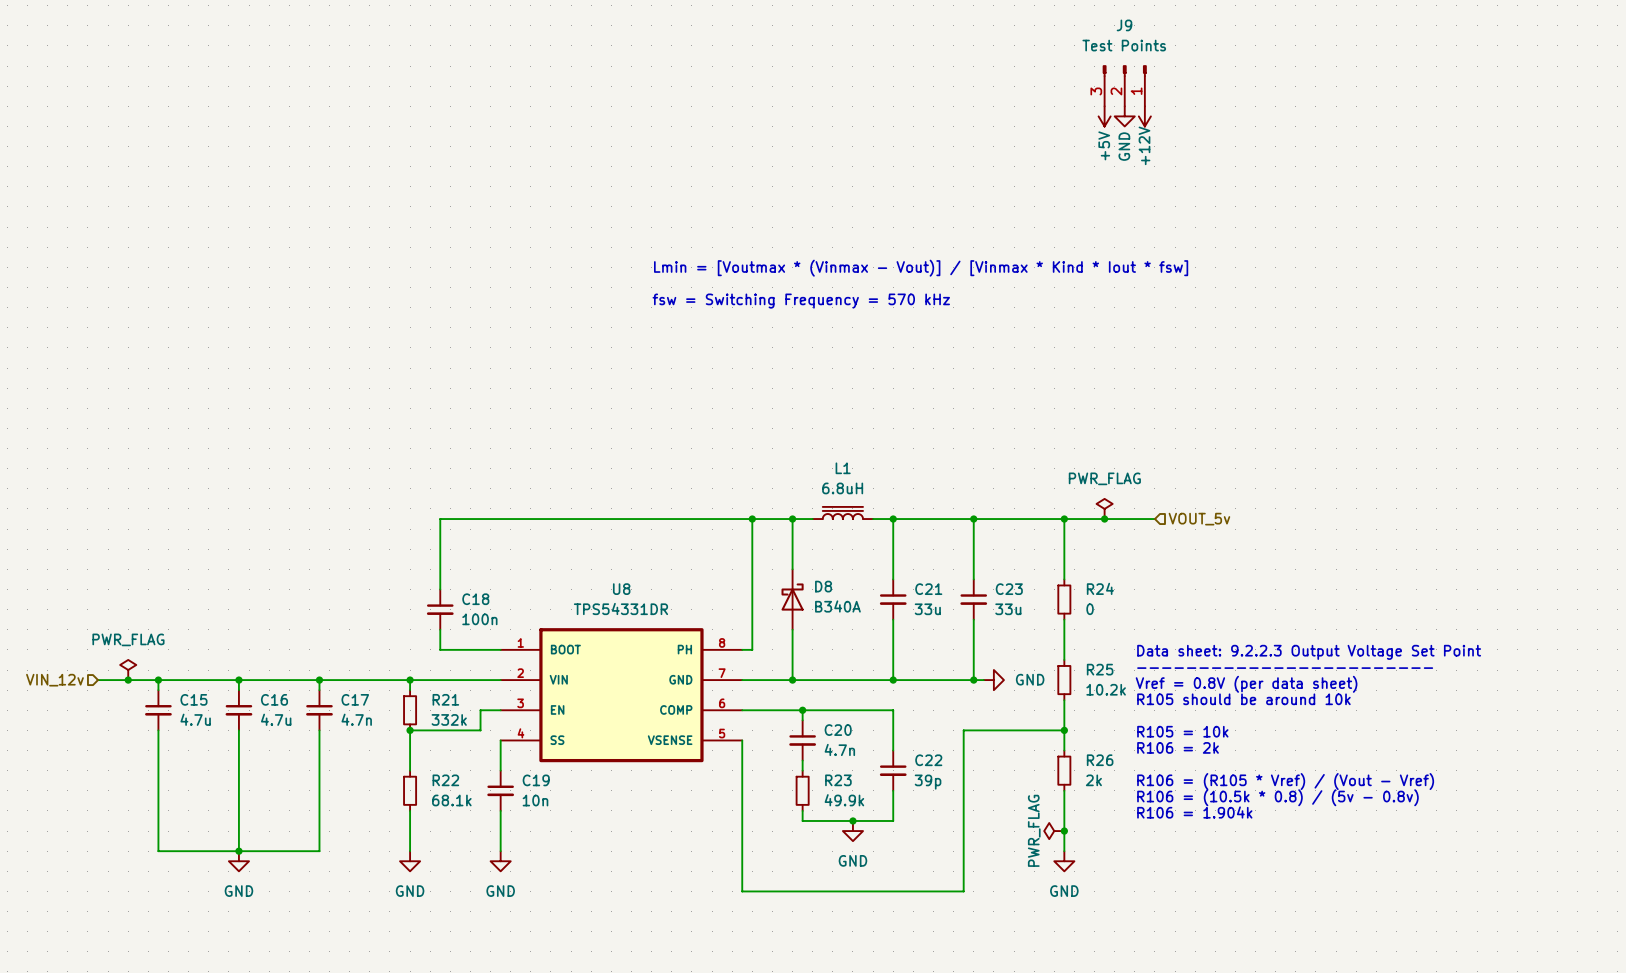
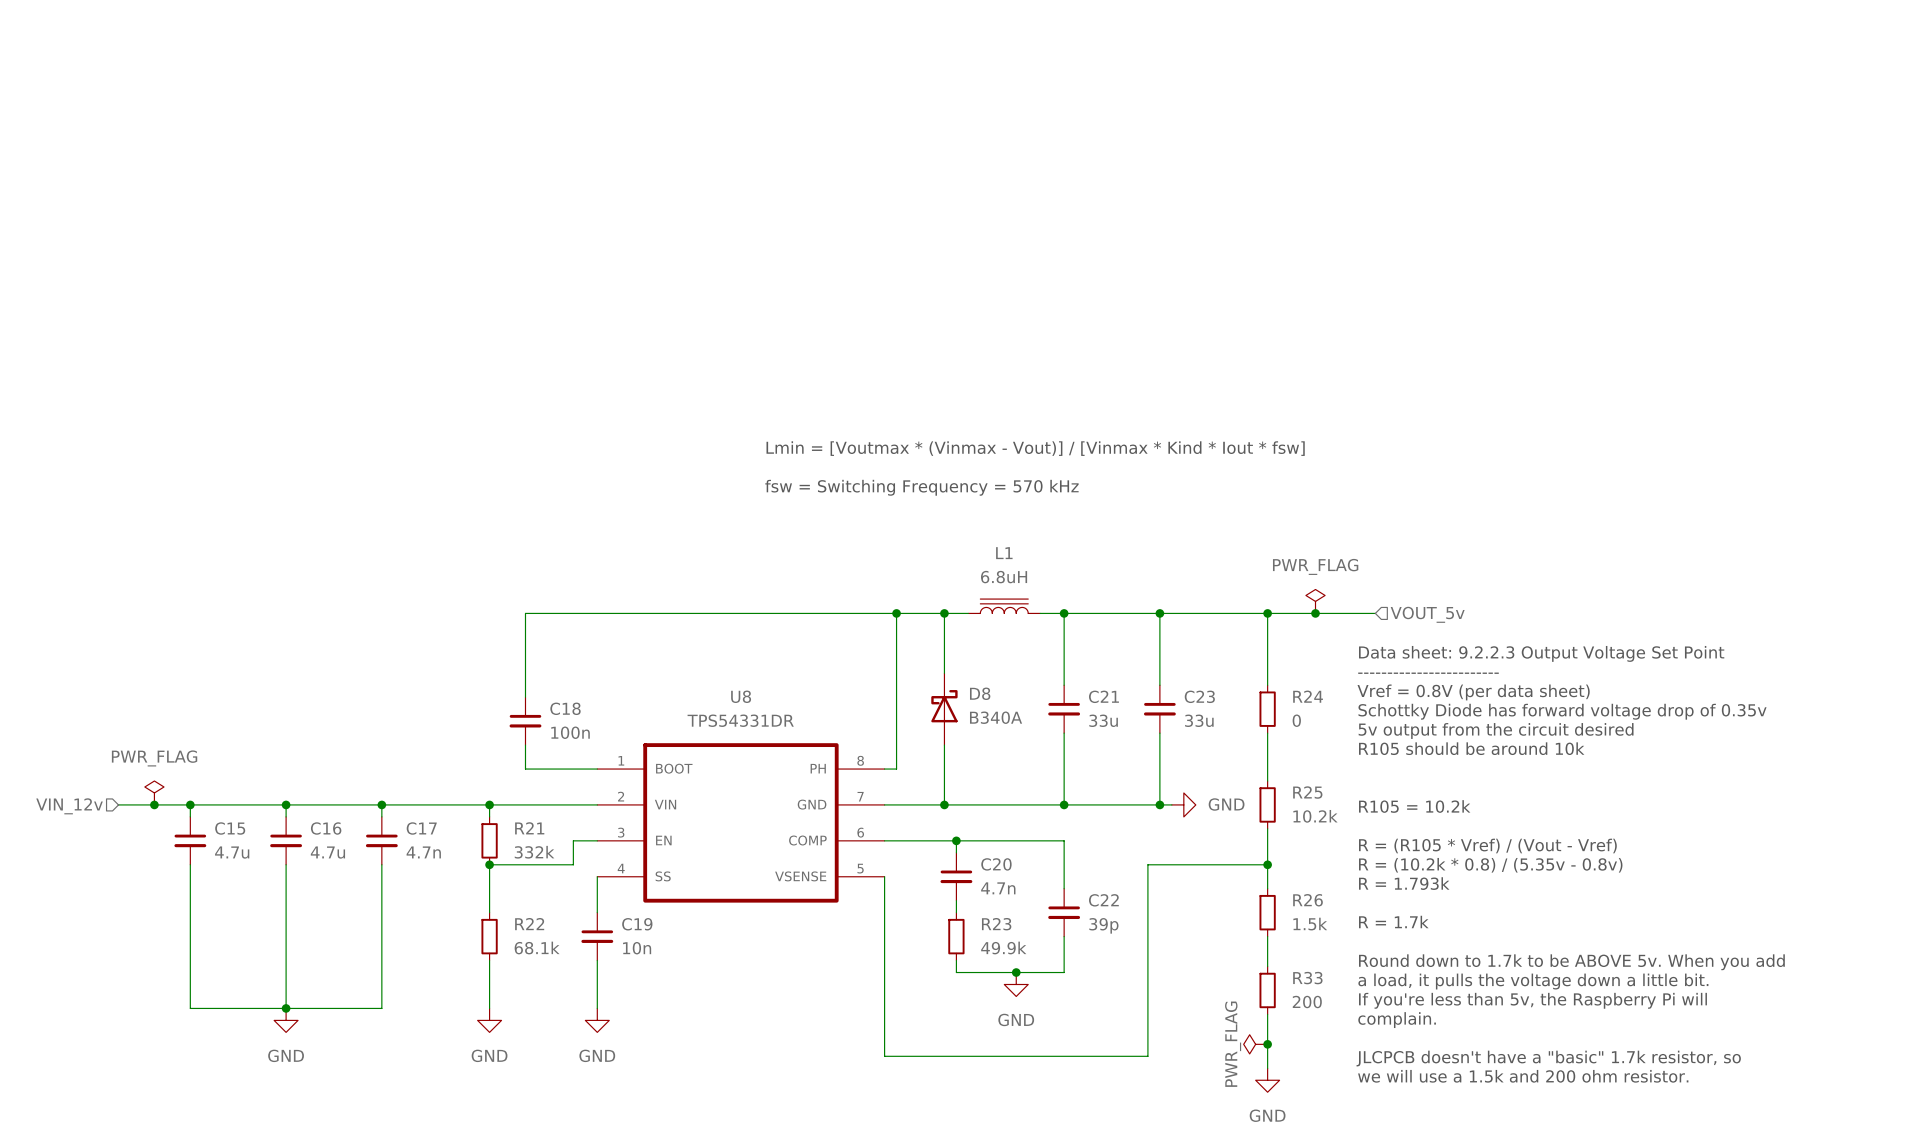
J9: Test Points (1124, 85) -> none
power symbol: +5V (1104, 116) -> none
power symbol: GND (1124, 116) -> none
power symbol: +12V (1144, 116) -> none
text position: Lmin = [Voutmax * (Vinmax - Vout)] / [Vinmax * Kind * Iout * fsw] (921, 268) -> Lmin = [Voutmax * (Vinmax - Vout)] / [Vinmax * Kind * Iout * fsw] (1035, 448)
text position: fsw = Switching Frequency = 570 kHz (801, 301) -> fsw = Switching Frequency = 570 kHz (921, 487)
text: none -> Schottky Diode has forward voltage drop of 0.35v (1562, 711)
text: none -> 5v output from the circuit desired (1496, 731)
text position: Data sheet: 9.2.2.3 Output Voltage Set Point (1309, 652) -> Data sheet: 9.2.2.3 Output Voltage Set Point (1541, 653)
text position: ------------------------ (1285, 668) -> ------------------------ (1428, 673)
text: none -> R105 = 10.2k (1414, 806)
text position: Vref = 0.8V (per data sheet) (1246, 684) -> Vref = 0.8V (per data sheet) (1473, 692)
text position: R105 should be around 10k (1243, 699) -> R105 should be around 10k (1471, 748)
text: none -> R = (R105 * Vref) / (Vout - Vref) (1487, 846)
text: R105 = 10k (1182, 731) -> R = (10.2k * 0.8) / (5.35v - 0.8v) (1490, 865)
text: R106 = 2k (1178, 747) -> R = 1.793k (1404, 883)
R26 value: 2k (1093, 780) -> 1.5k (1310, 924)
text: R106 = (R105 * Vref) / (Vout - Vref) (1285, 781) -> R = 1.7k (1393, 922)
text: R106 = (10.5k * 0.8) / (5v - 0.8v) (1277, 797) -> none
text: R106 = 1.904k (1194, 812) -> Round down to 1.7k to be ABOVE 5v. When you add (1571, 962)
wire: (1064, 815) (1064, 851) -> none
text: none -> a load, it pulls the voltage down a little bit. (1533, 981)
power symbol position: PWR_FLAG (1054, 831) -> PWR_FLAG (1255, 1044)
junction: (1064, 831) -> none
R33: none -> 200 (1267, 990)
text: none -> If you're less than 5v, the Raspberry Pi will (1532, 1000)
wire: none -> (1267, 1014) (1267, 1068)
power symbol position: GND (1064, 861) -> GND (1267, 1080)
text: none -> complain. (1397, 1020)
junction: none -> (1267, 1044)
text: none -> JLCPCB doesn't have a "basic" 1.7k resistor, so (1548, 1058)
text: none -> we will use a 1.5k and 200 ohm resistor. (1523, 1076)

